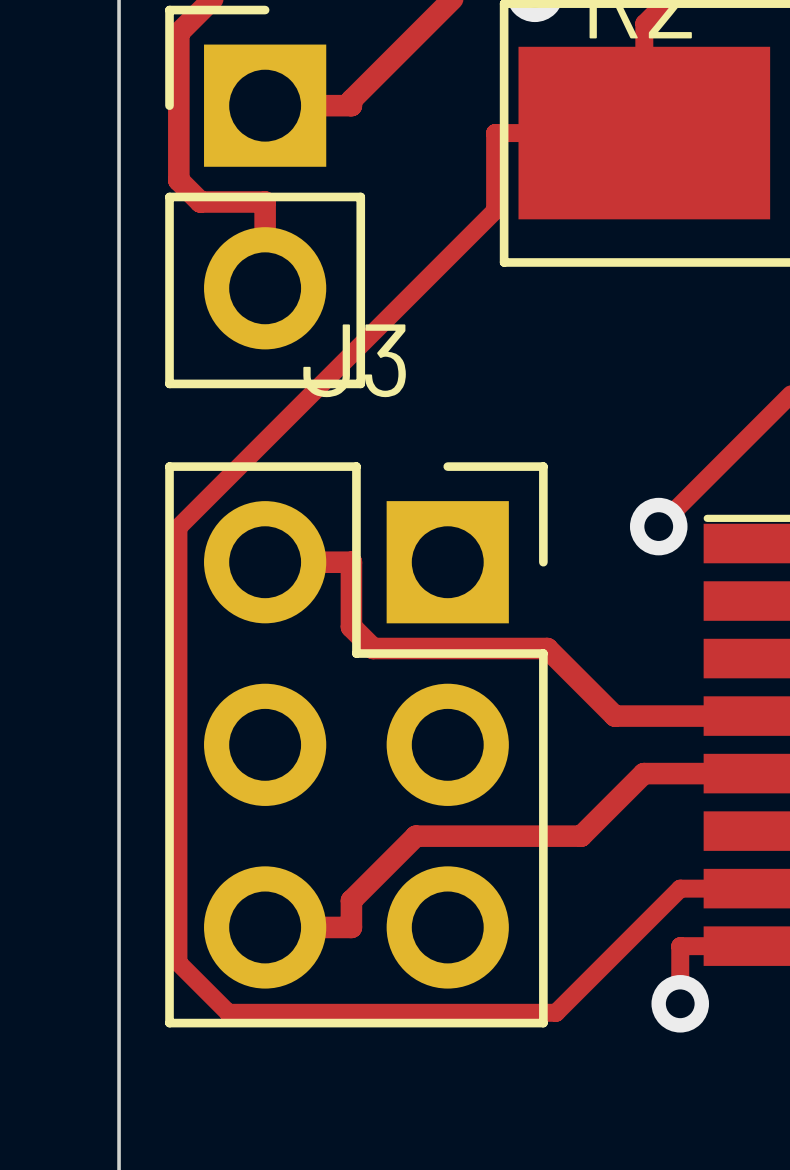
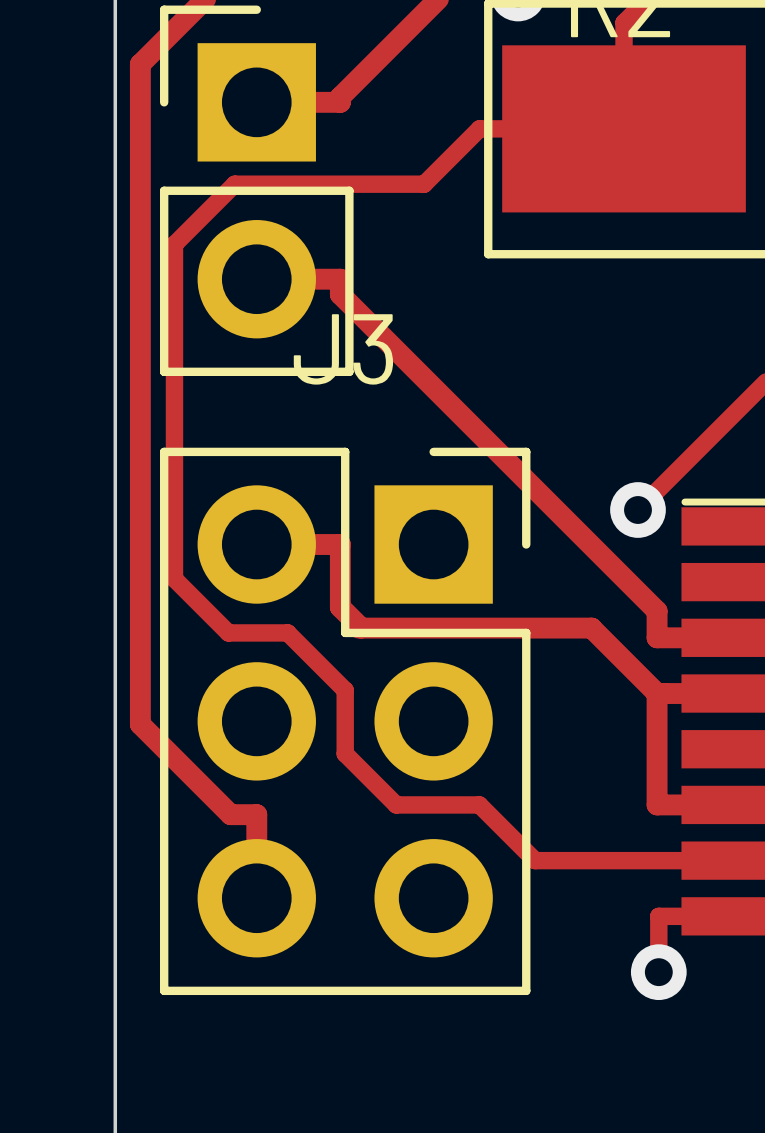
track: (178, 32) (178, 180) (200, 201) (265, 201) (265, 288) -> (173, 31) (140, 64) (140, 724) (230, 814) (256, 814) (256, 898)
track: (495, 133) (495, 210) (178, 527) (178, 962) (228, 1012) (556, 1012) (680, 888) -> (479, 128) (424, 184) (234, 184) (174, 244) (174, 578) (228, 632) (287, 632) (345, 690) (345, 753) (396, 804) (479, 804) (535, 860) (658, 860)
track: none -> (256, 279) (340, 279) (340, 294) (657, 611) (657, 637) (733, 637)
track: (547, 648) (614, 716) (678, 716) -> (530, 628) (591, 628) (657, 693) (657, 804) (733, 804)
track: (757, 773) (643, 773) (581, 836) (415, 836) (351, 900) (351, 927) (265, 927) -> none

